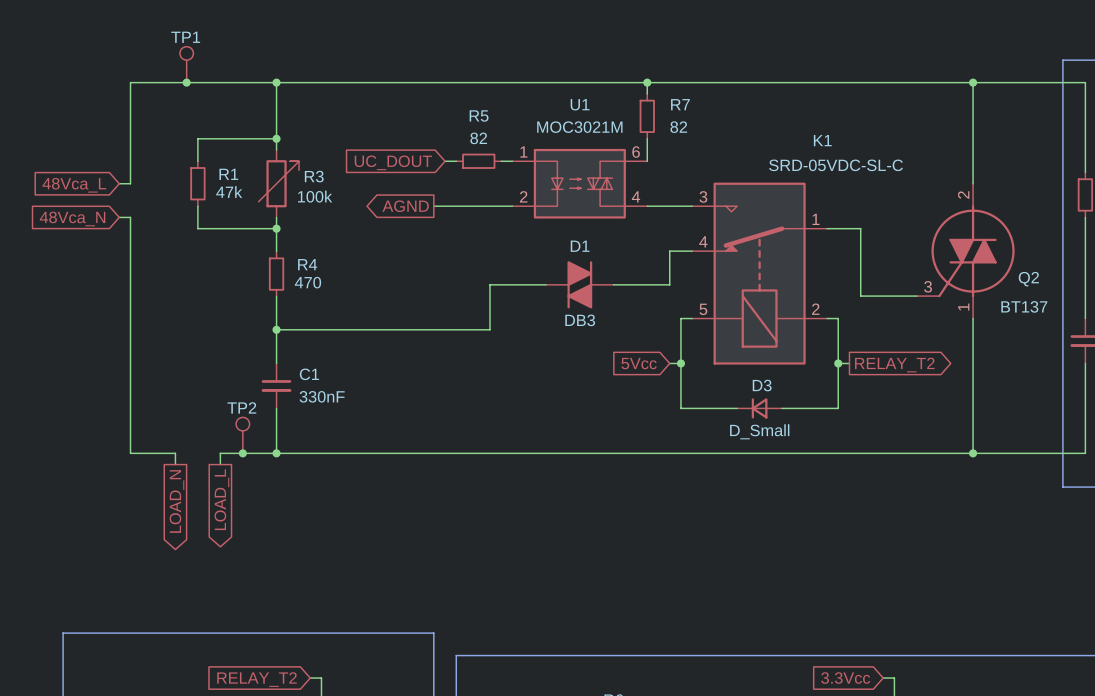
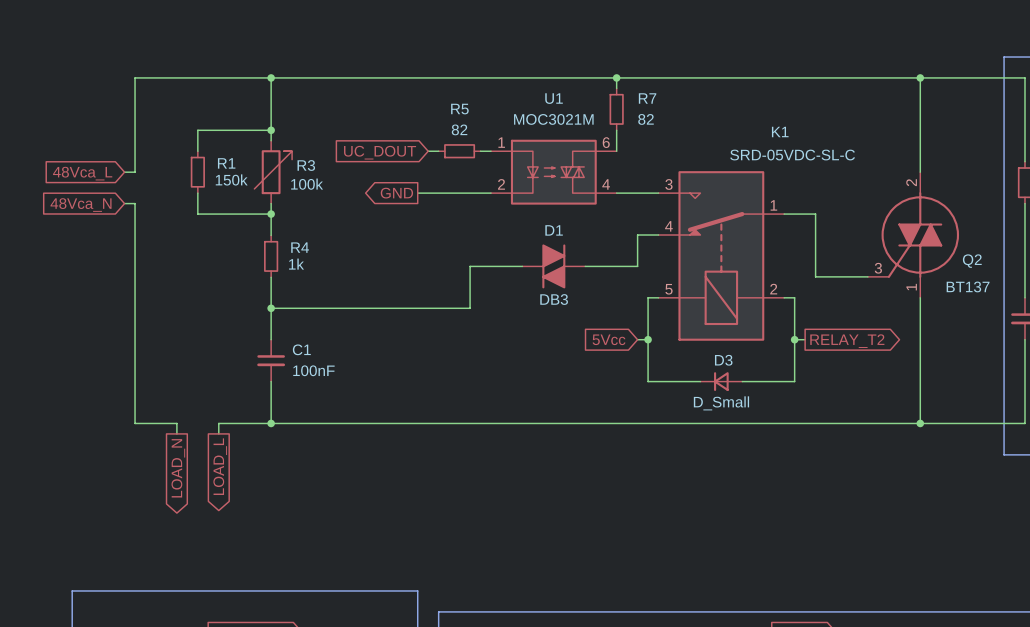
TP1: (186, 64) -> none
junction: (186, 82) -> none
R1 value: 47k (229, 192) -> 150k (231, 179)
global label: AGND (405, 206) -> GND (396, 193)
R4 value: 470 (308, 282) -> 1k (296, 264)
C1 value: 330nF (322, 396) -> 100nF (313, 370)
TP2: (242, 435) -> none
junction: (242, 453) -> none

